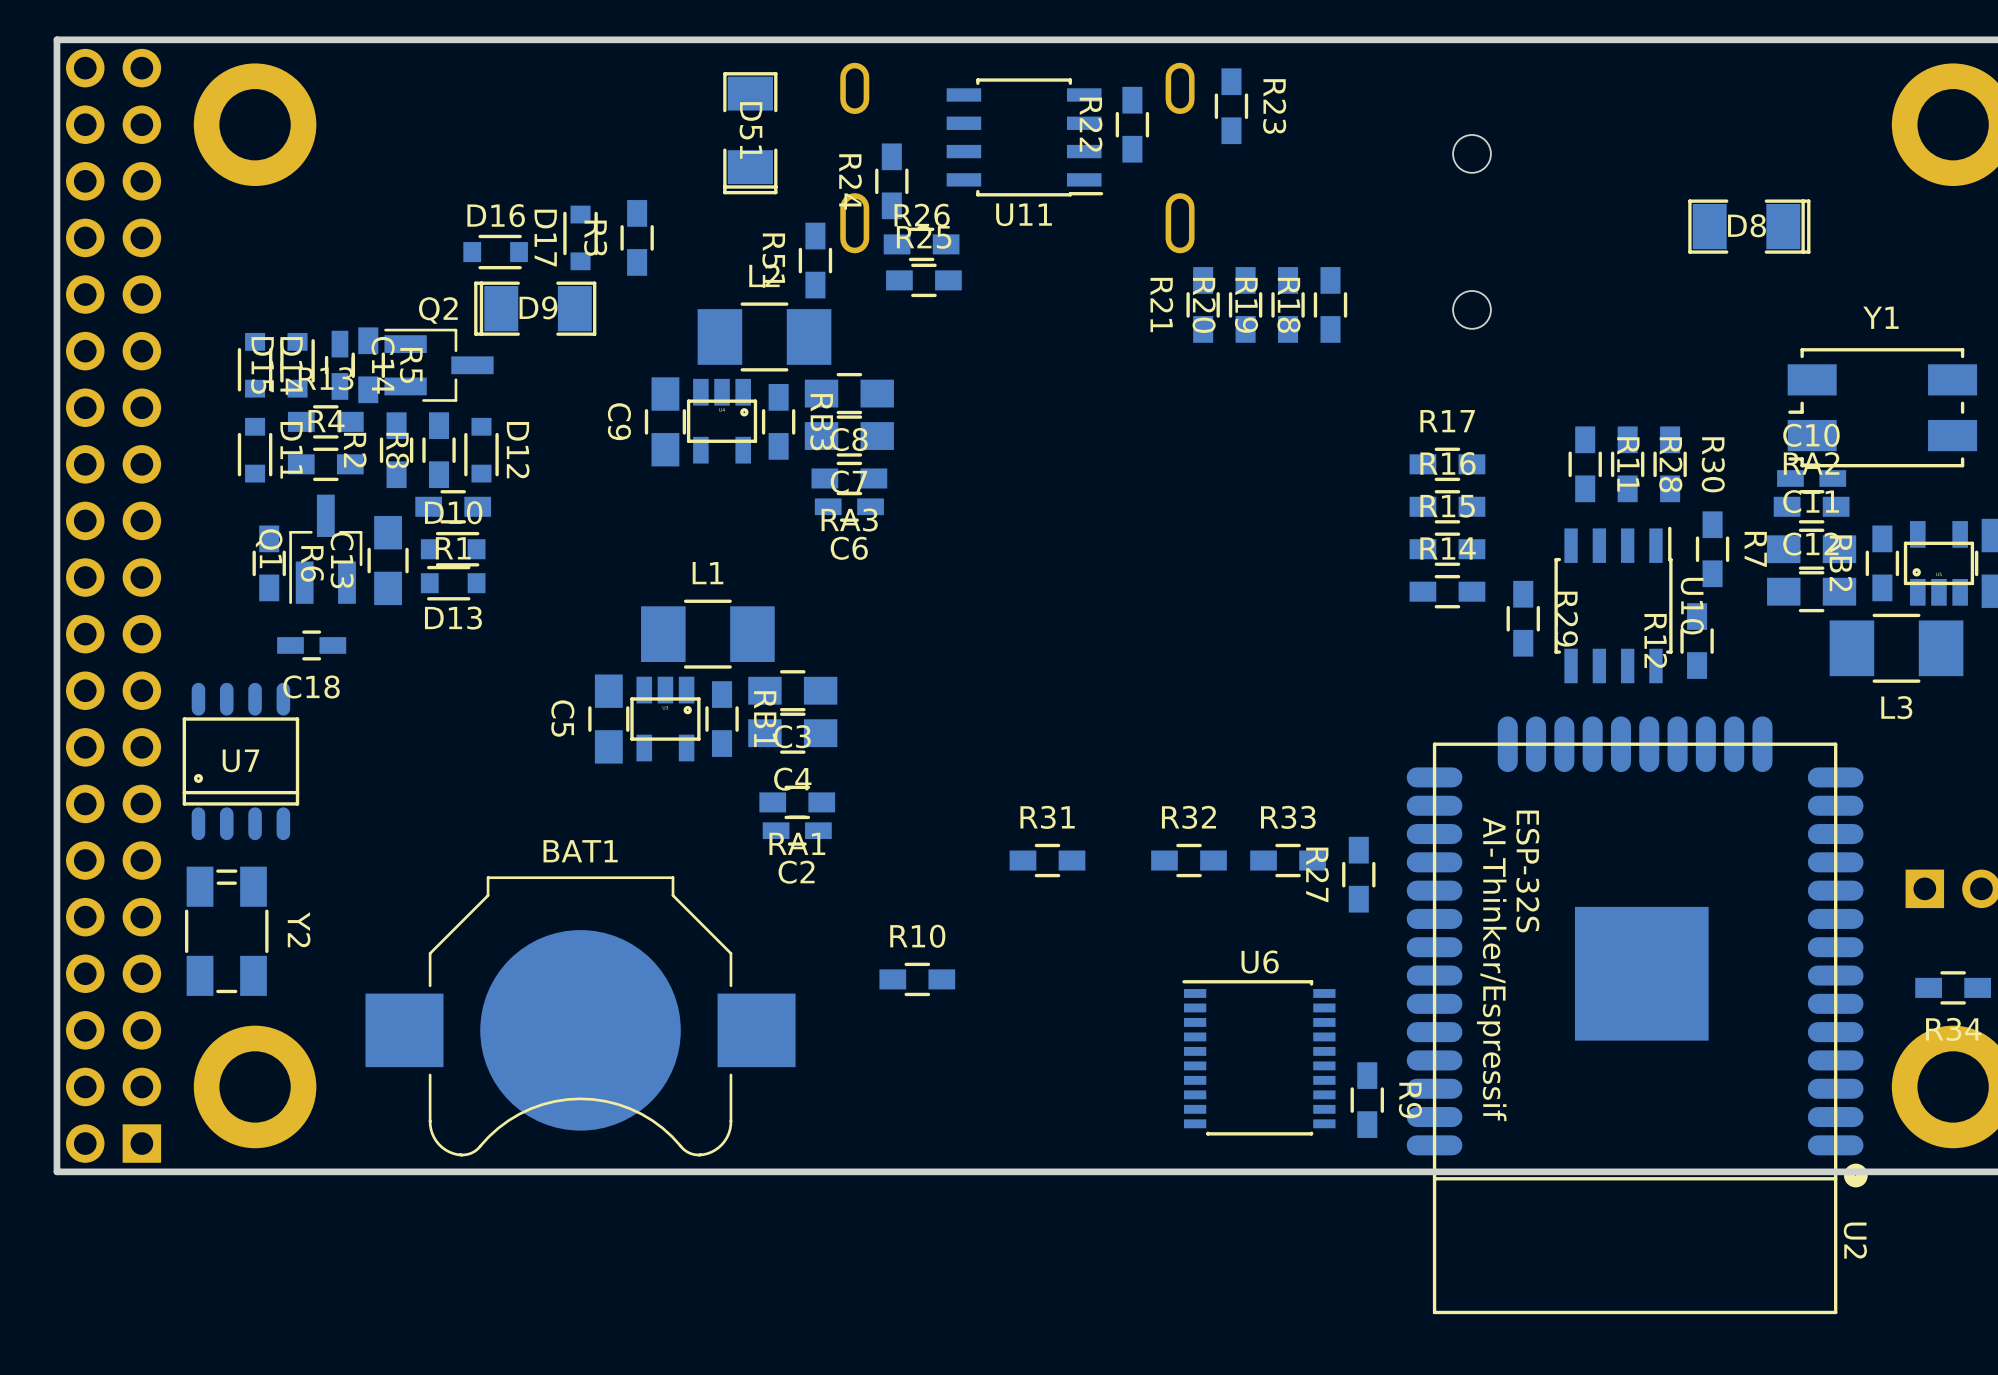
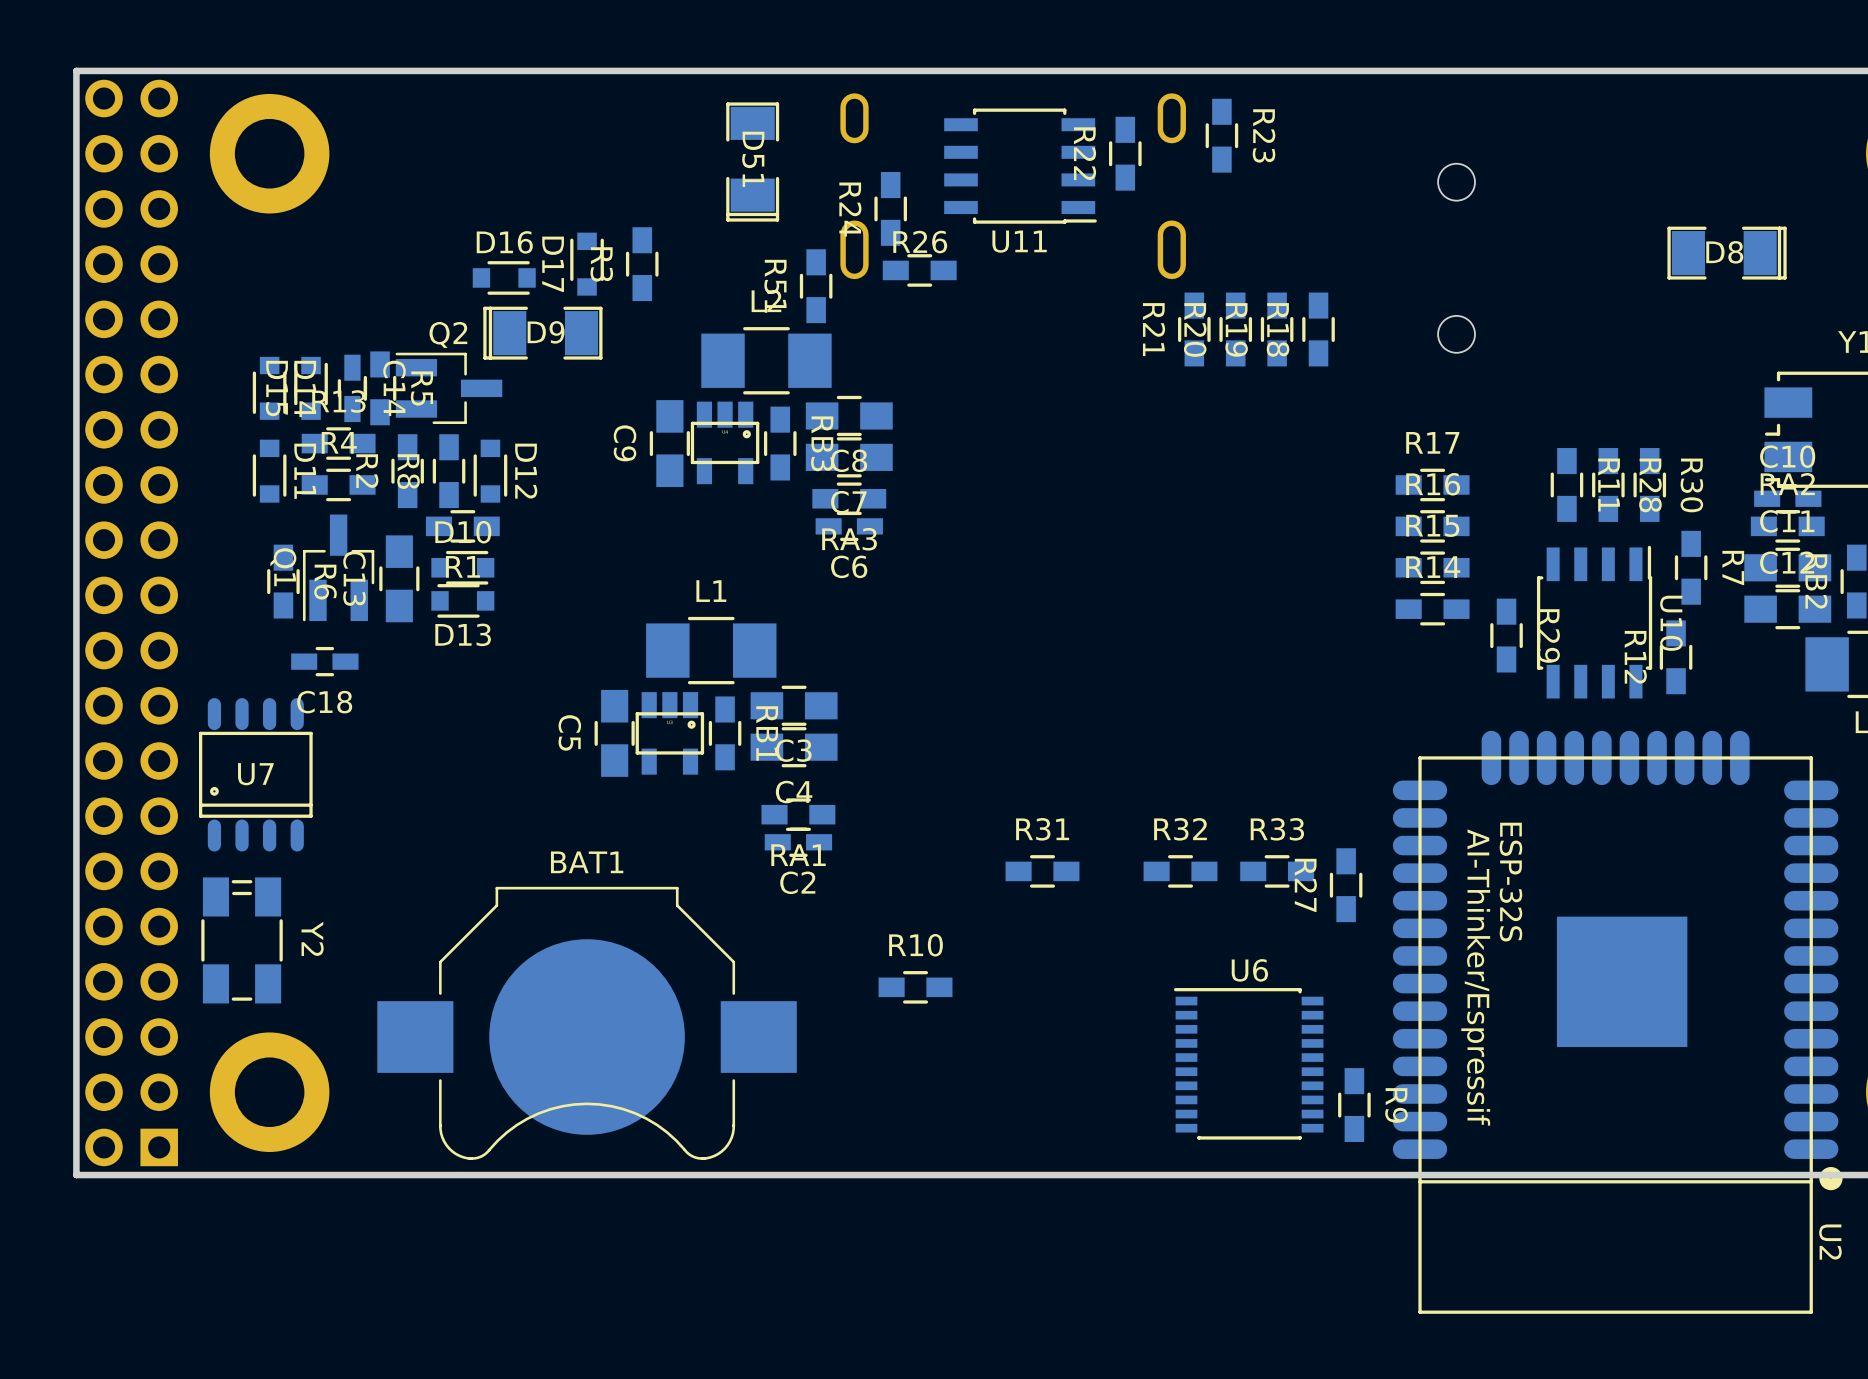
R25: (923, 280) -> none

